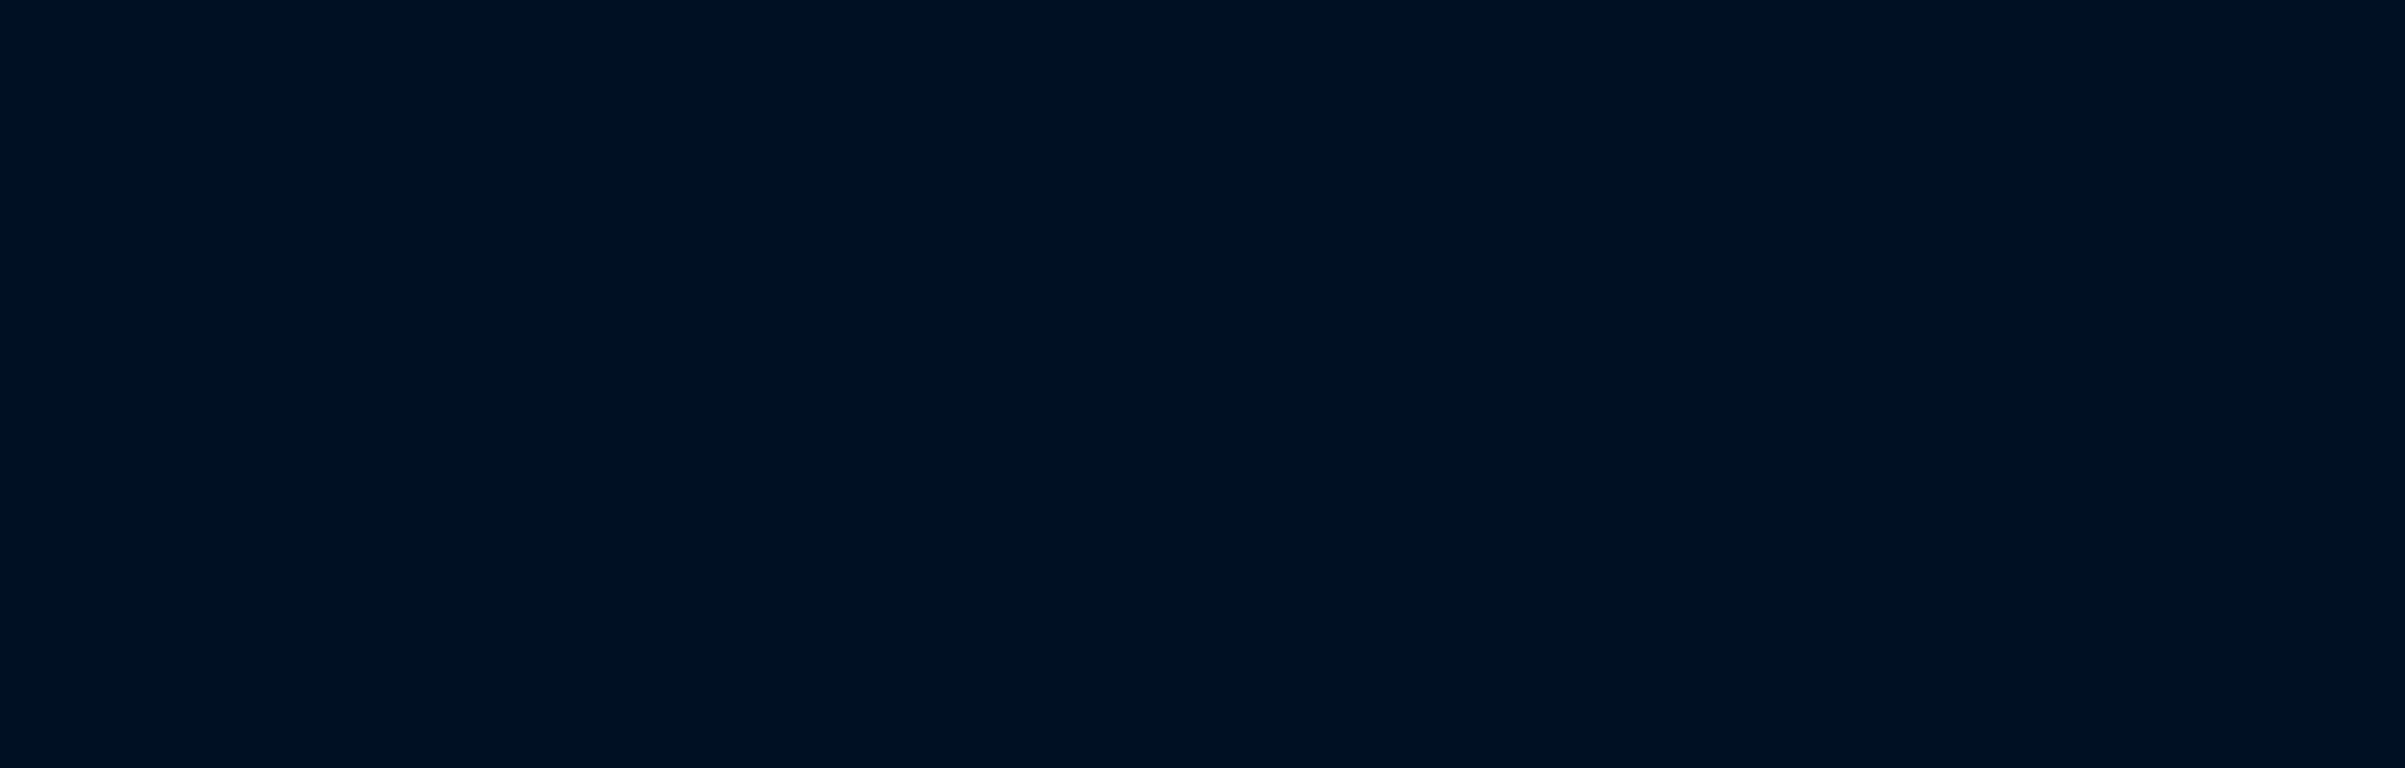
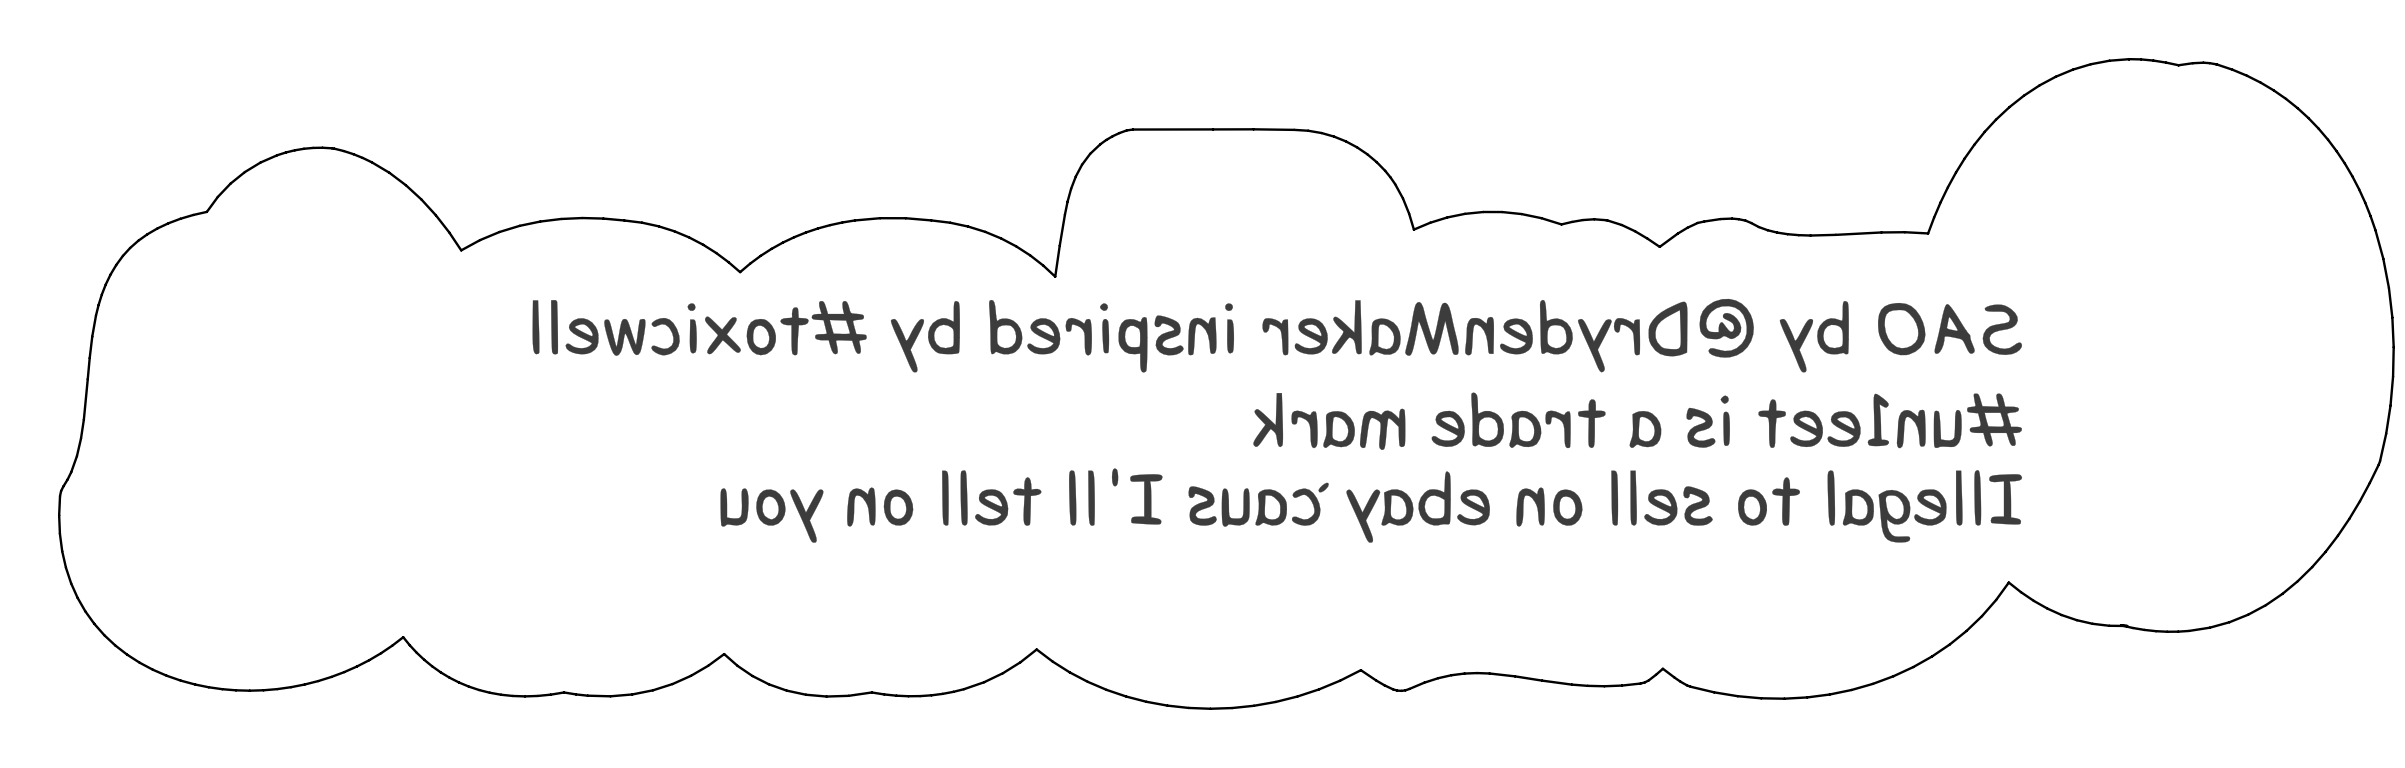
board edge: none -> (2129, 59) (2153, 60) (2178, 65) (2203, 62) (2217, 64) (2260, 82) (2297, 108) (2328, 139) (2344, 163) (2359, 189) (2375, 230) (2388, 288) (2393, 347) (2390, 405) (2380, 461) (2369, 483) (2337, 535) (2297, 581) (2265, 605) (2248, 614) (2209, 627) (2167, 631) (2144, 629) (2133, 628) (2121, 625) (2127, 625) (2109, 625) (2092, 623) (2076, 620) (2047, 608) (2008, 582) (1996, 600) (1966, 630) (1949, 644) (1913, 667) (1893, 676) (1851, 689) (1807, 697) (1784, 698) (1737, 696) (1690, 686) (1662, 668) (1644, 682) (1622, 685) (1571, 684) (1477, 673) (1438, 678) (1401, 690) (1384, 685) (1360, 670) (1319, 689) (1275, 701) (1232, 708) (1188, 707) (1146, 701) (1106, 689) (1069, 672) (1036, 649) (1002, 673) (984, 682) (953, 691) (931, 695) (896, 695) (871, 692) (848, 695) (805, 694) (768, 684) (752, 676) (724, 654) (691, 675) (672, 684) (632, 694) (587, 695) (564, 692) (537, 695) (512, 695) (479, 690) (449, 677) (424, 659) (403, 637) (369, 660) (331, 676) (304, 684) (277, 689) (235, 690) (208, 687) (180, 680) (152, 669) (127, 654) (104, 635) (85, 611) (71, 583) (65, 567) (59, 533) (60, 496) (71, 472) (81, 438) (96, 315) (110, 274) (130, 248) (147, 234) (168, 223) (206, 211) (217, 196) (244, 172) (260, 162) (285, 152) (313, 147) (331, 148) (353, 154) (371, 162) (389, 172) (421, 199) (435, 215) (461, 250) (480, 240) (519, 225) (561, 218) (603, 218) (642, 222) (674, 231) (703, 244) (740, 272) (771, 248) (794, 237) (817, 228) (854, 220) (905, 218) (950, 222) (985, 231) (1016, 246) (1055, 276) (1067, 201) (1075, 176) (1090, 153) (1100, 144) (1119, 133) (1132, 129) (1294, 129) (1334, 136) (1357, 147) (1385, 170) (1402, 198) (1413, 229) (1447, 217) (1465, 213) (1502, 212) (1541, 218) (1561, 224) (1582, 220) (1607, 220) (1635, 231) (1659, 246) (1677, 233) (1697, 222) (1720, 219) (1745, 220) (1767, 230) (1798, 235) (1881, 232) (1928, 233) (1947, 187) (1964, 158) (1984, 131) (2009, 107) (2039, 85) (2072, 69) (2109, 60) (2128, 59)
drawing: none -> [532, 298, 2023, 543]

